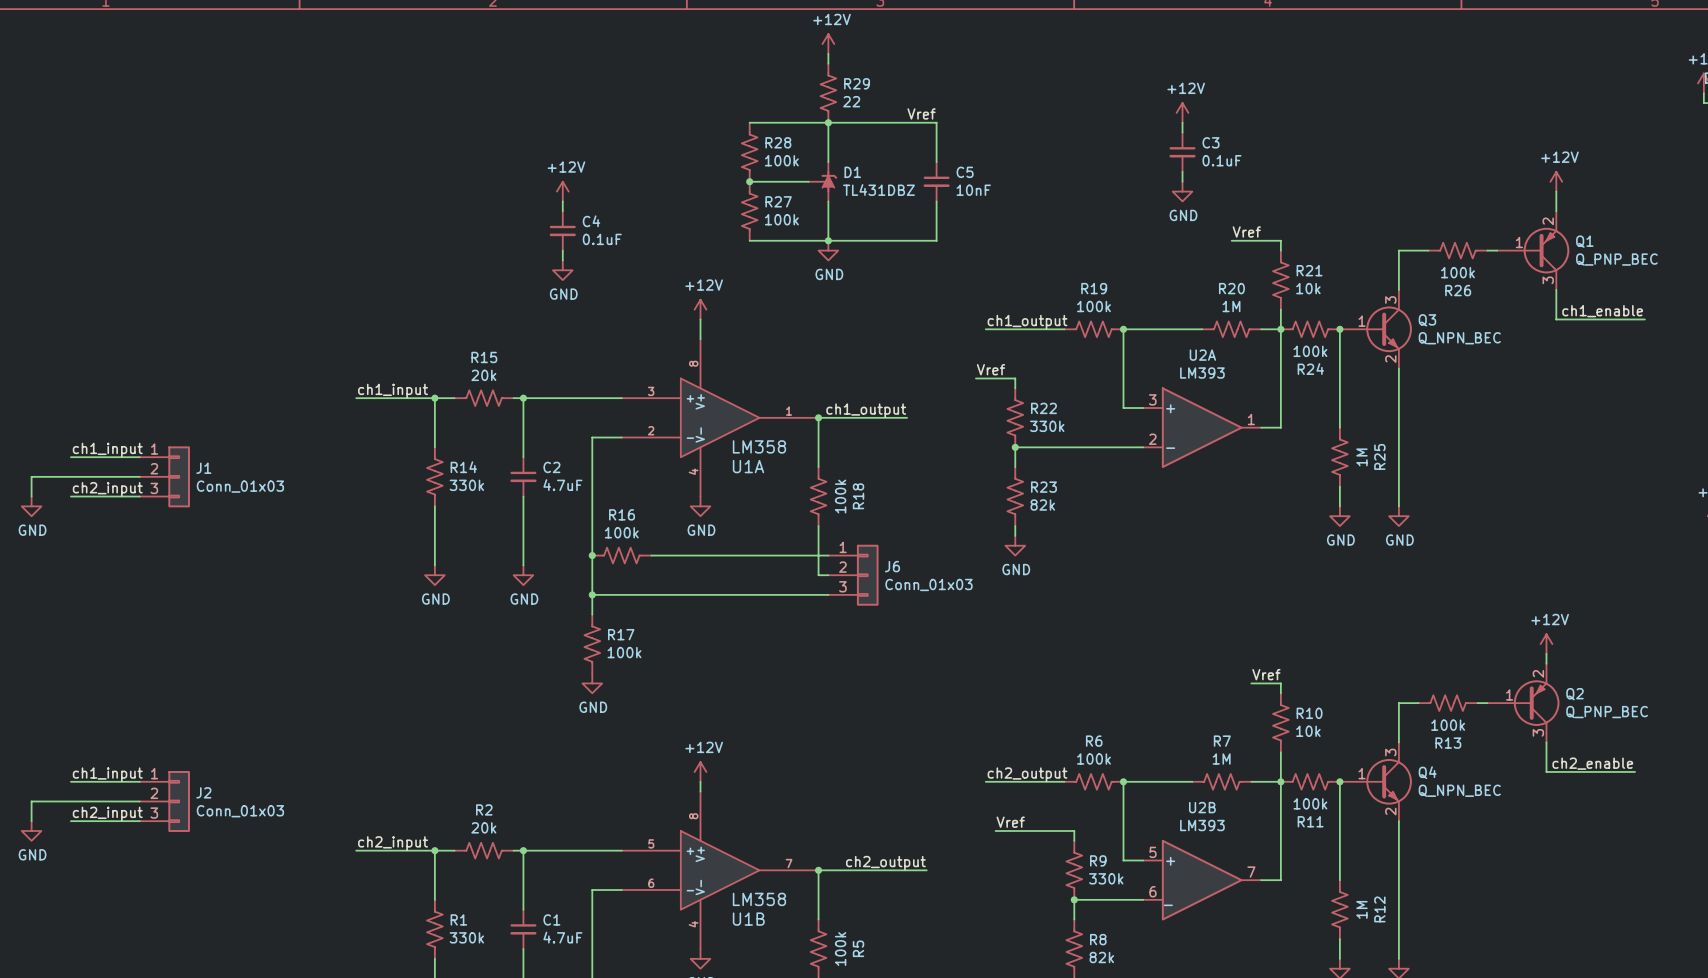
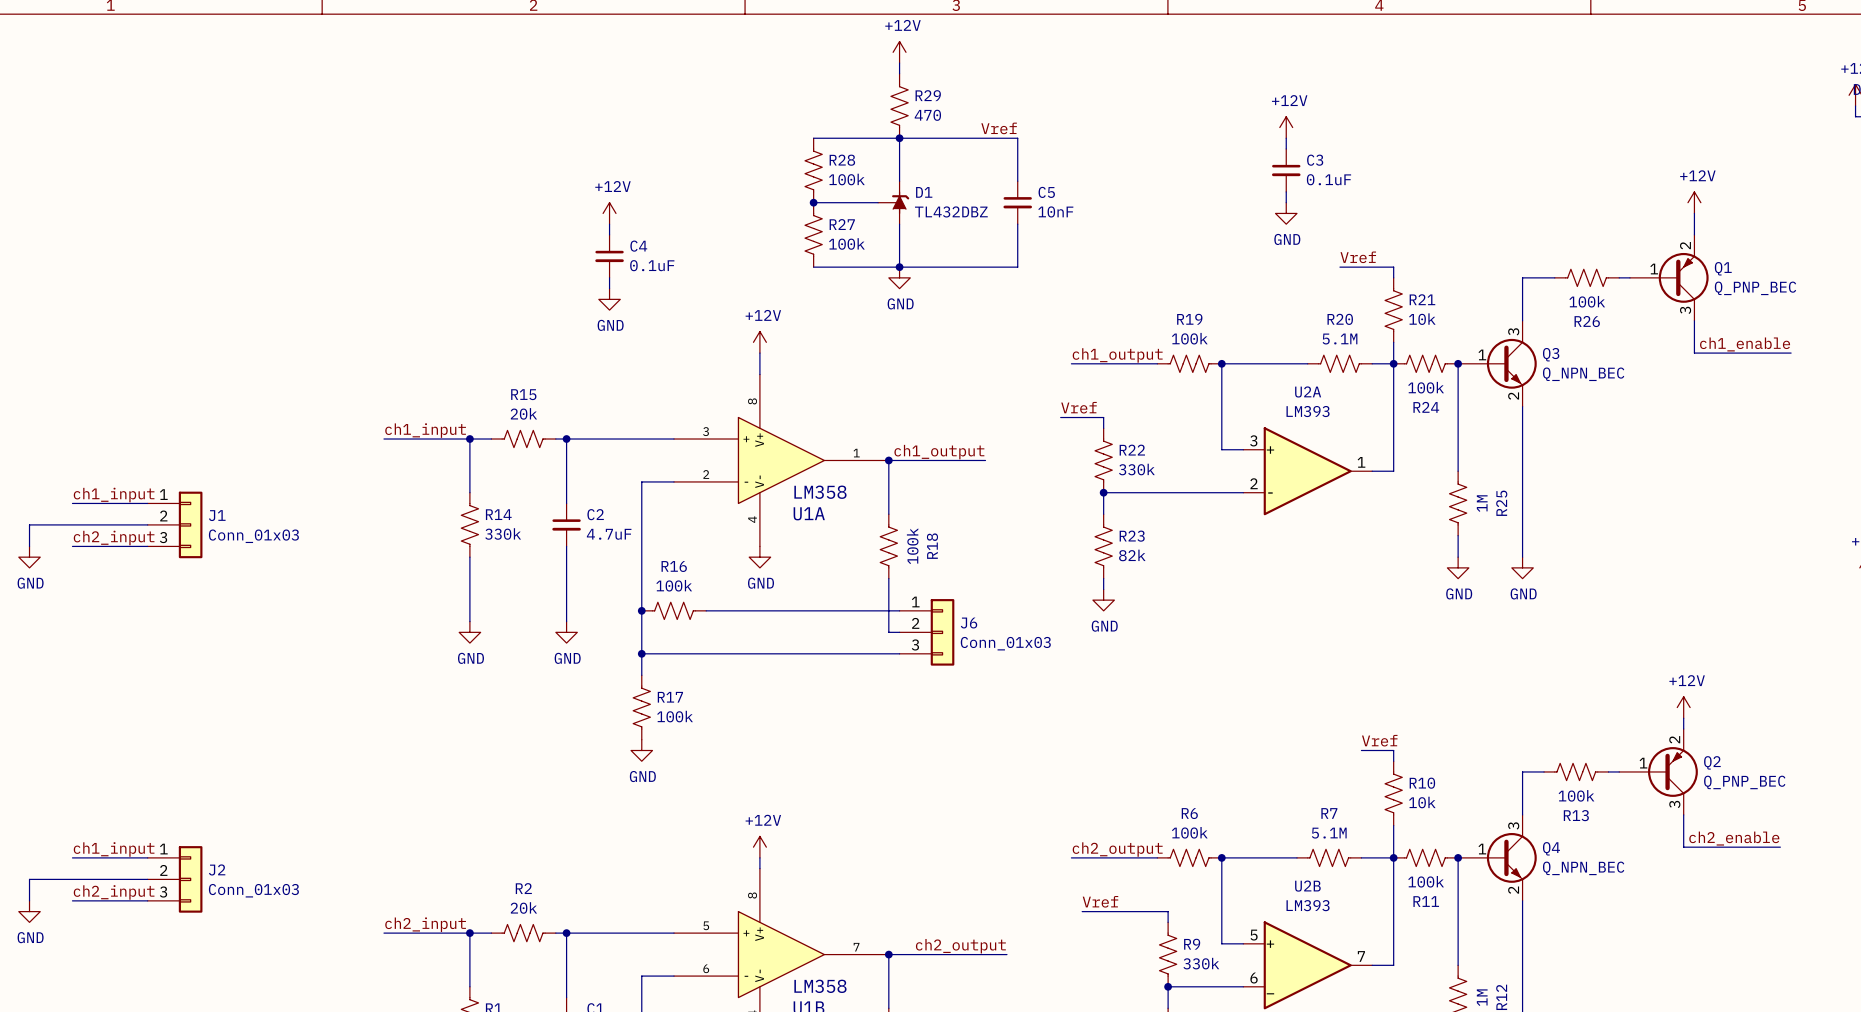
R29 value: 22 (851, 101) -> 470 (927, 115)
D1 value: TL431DBZ (879, 190) -> TL432DBZ (951, 211)
R20 value: 1M (1231, 306) -> 5.1M (1340, 339)
R7 value: 1M (1221, 759) -> 5.1M (1329, 833)

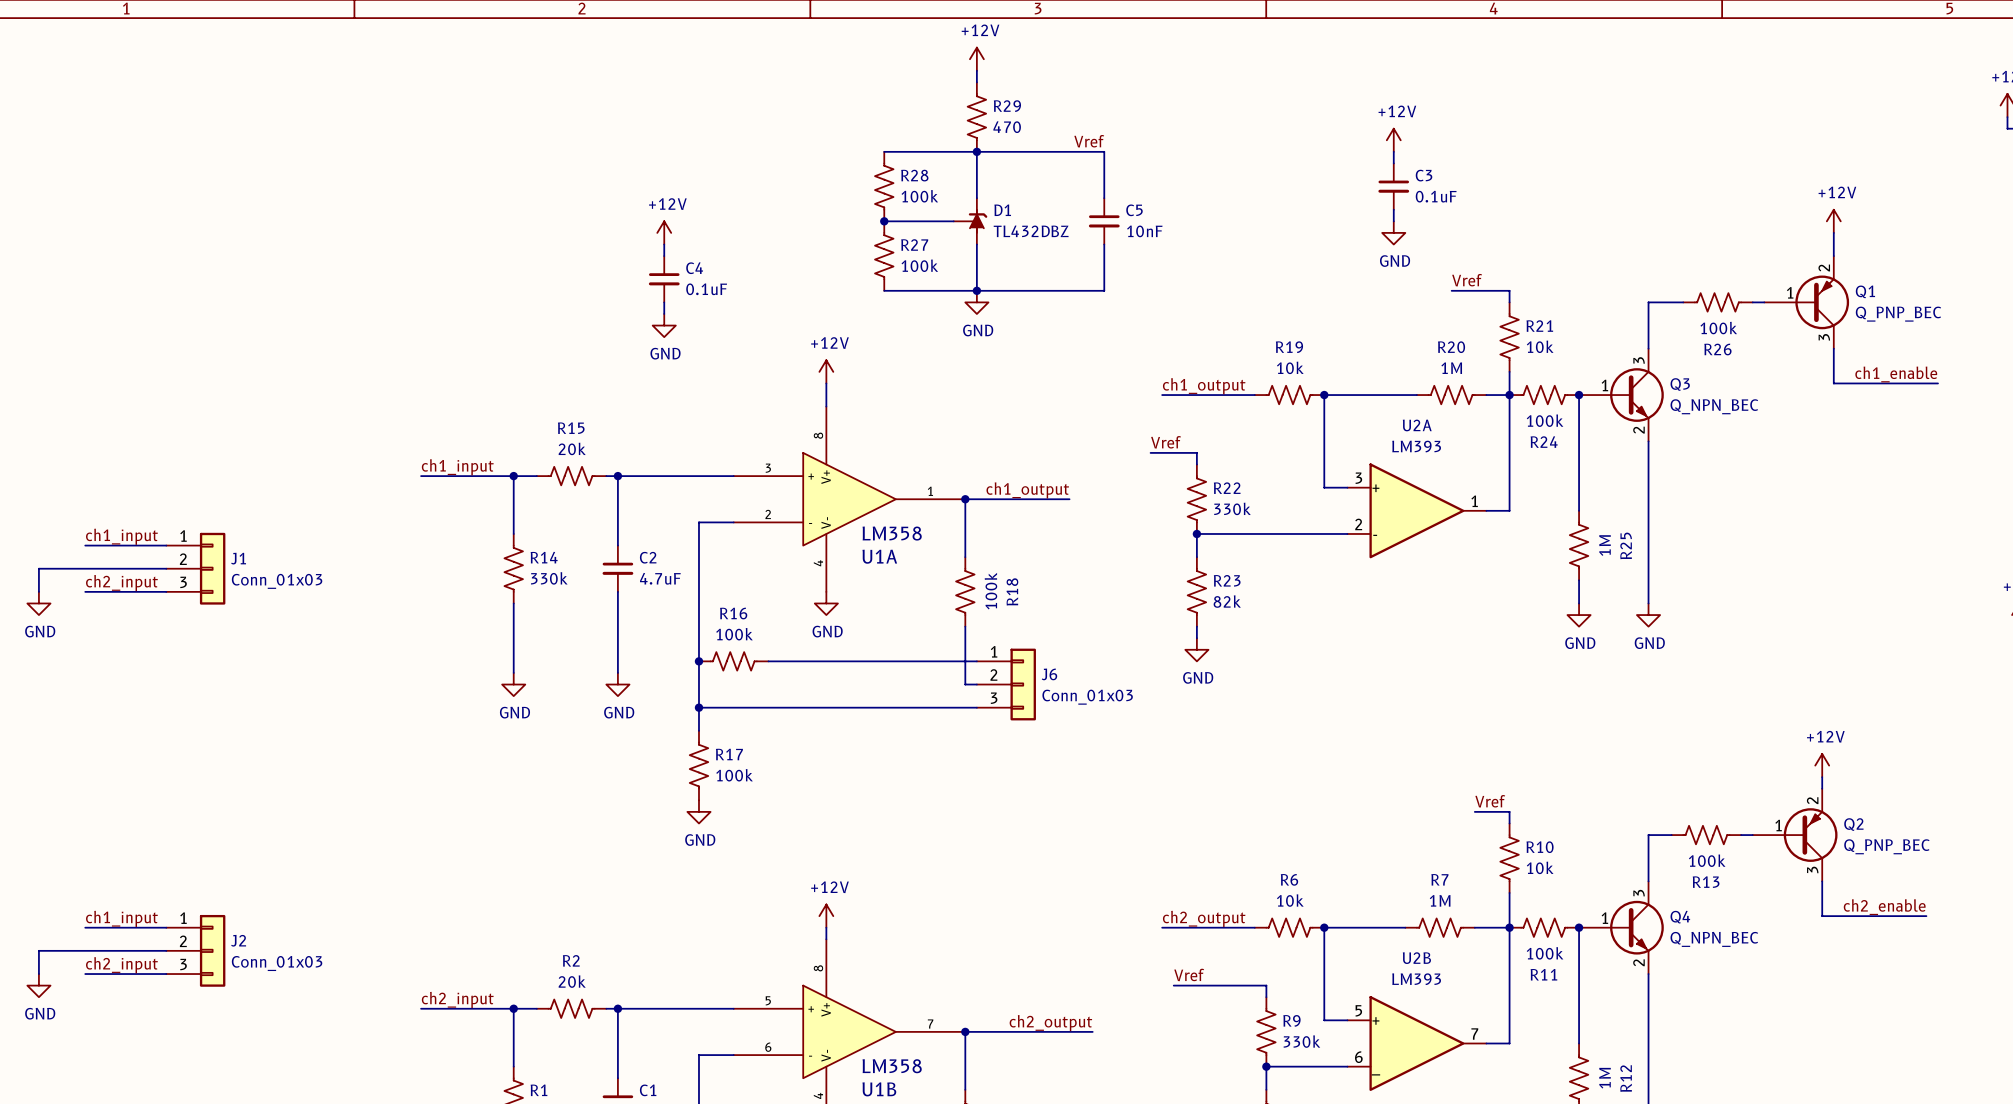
R19 value: 100k (1189, 338) -> 10k (1290, 367)
R20 value: 5.1M (1340, 339) -> 1M (1451, 368)
R6 value: 100k (1189, 832) -> 10k (1290, 900)
R7 value: 5.1M (1329, 833) -> 1M (1440, 900)

